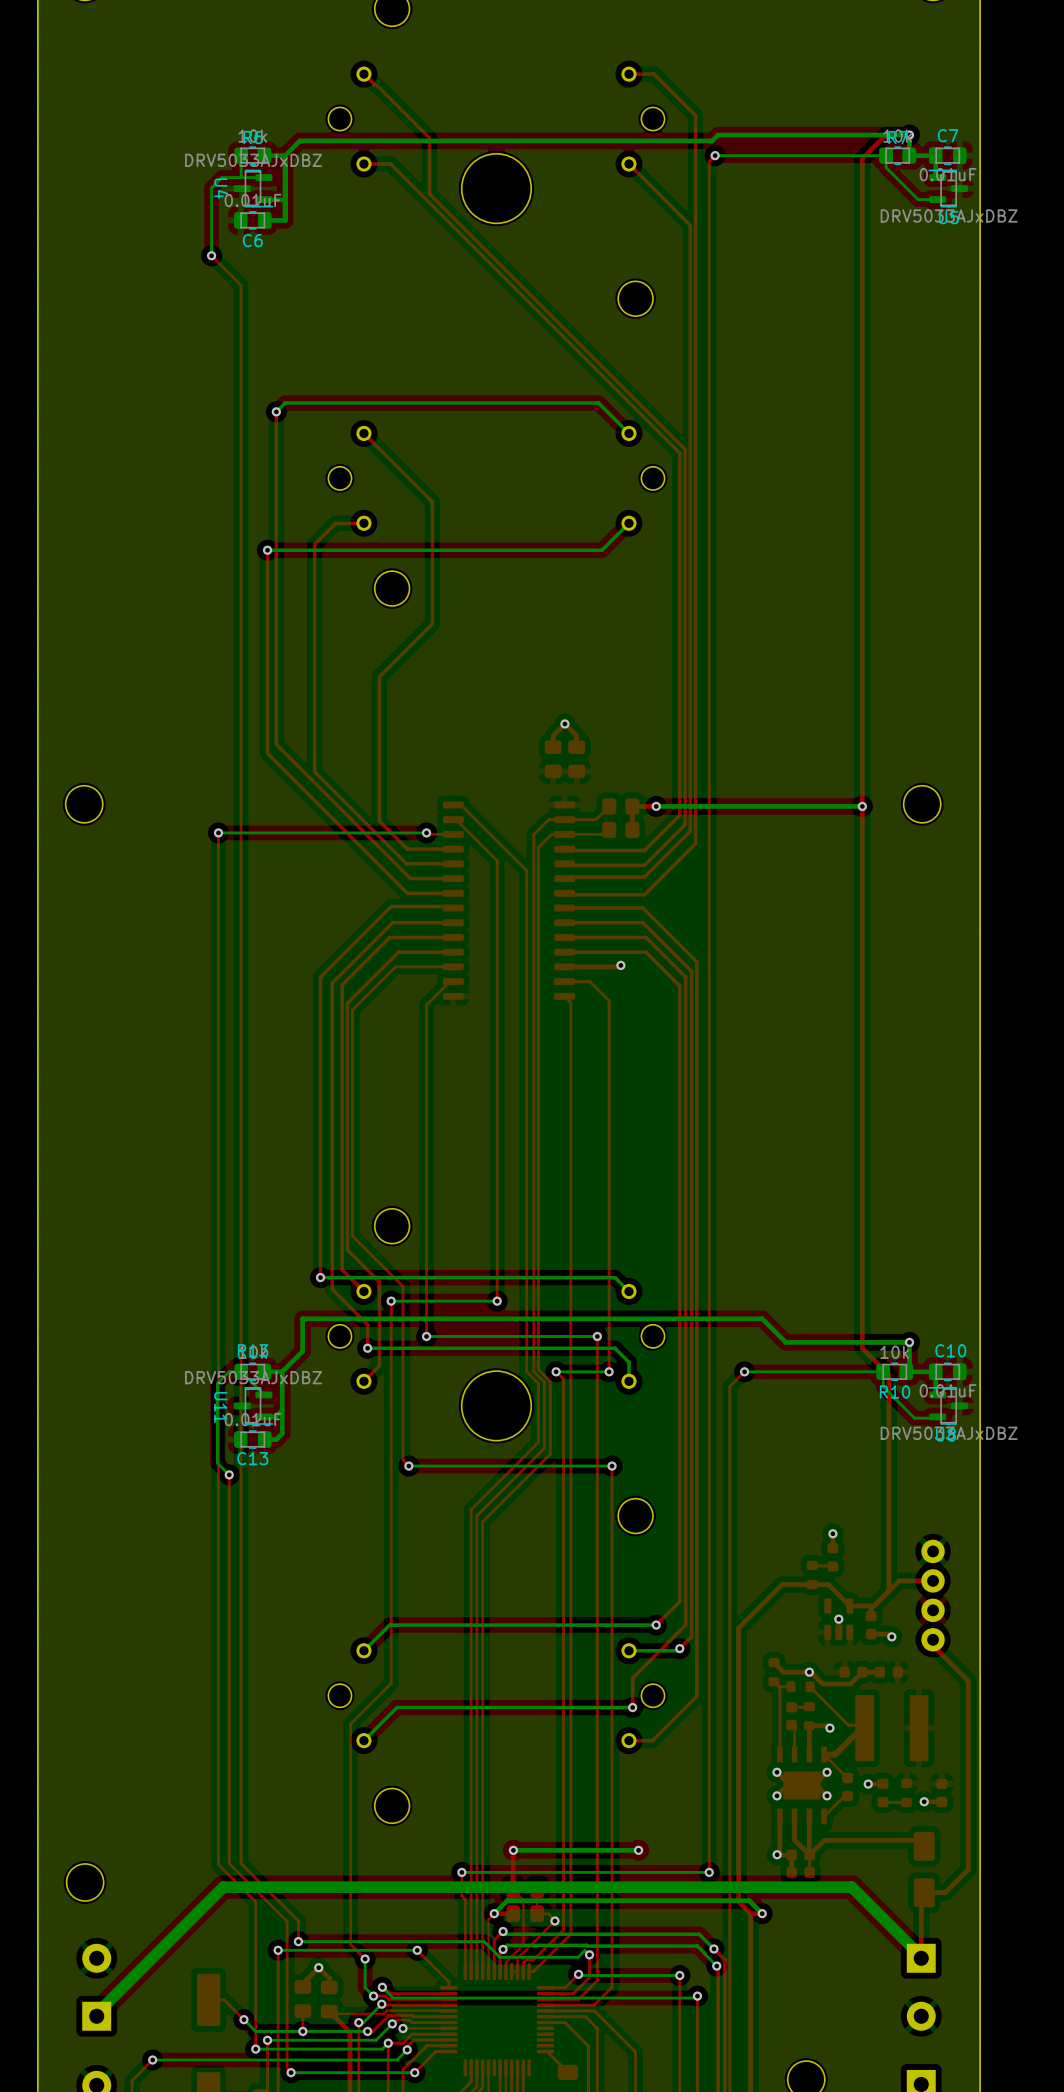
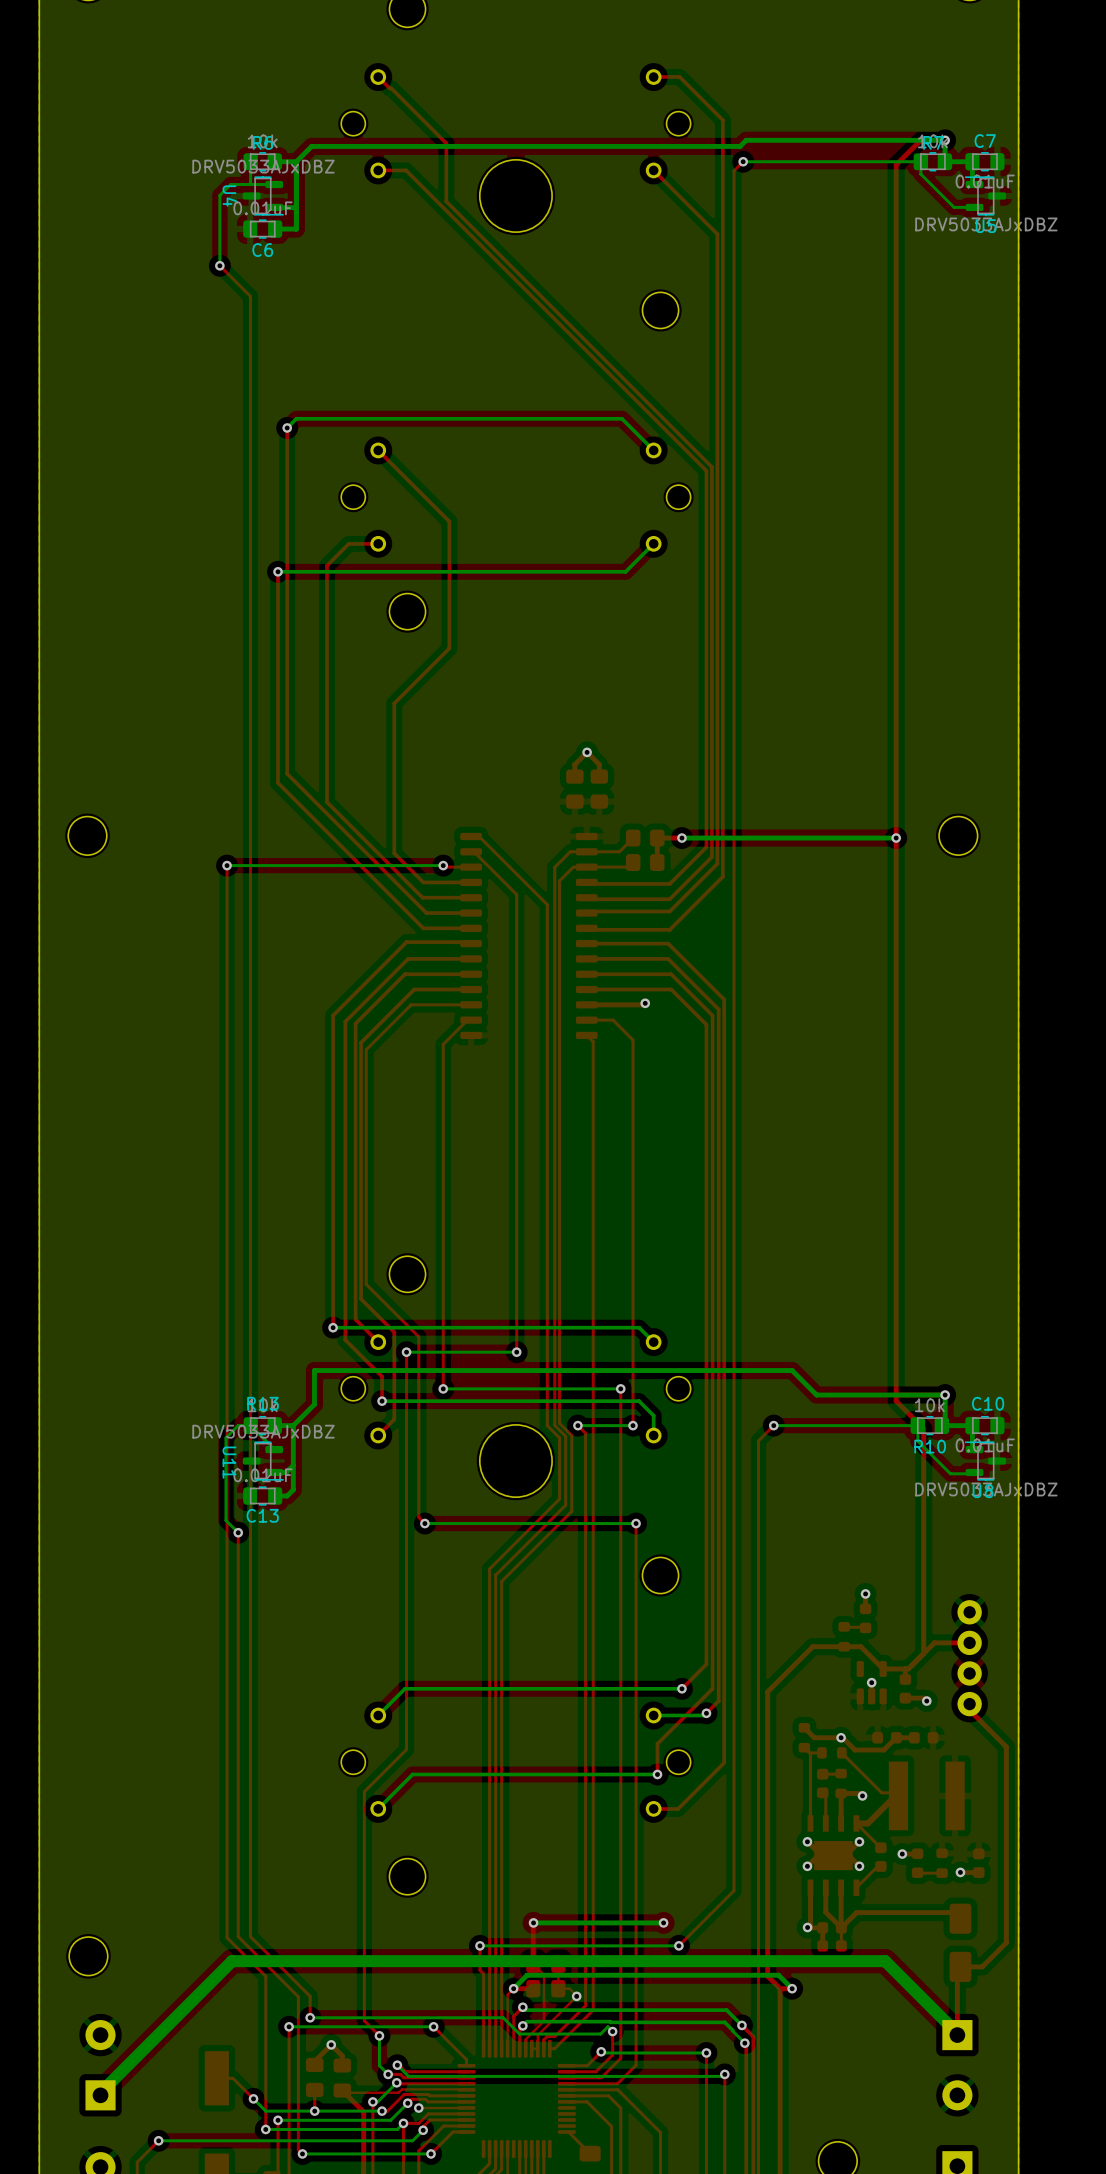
top track: (709, 161) (709, 1872) -> (737, 167) (733, 170) (733, 1890) (678, 1945)
bottom track: (709, 1872) (653, 1872) -> none
via position: (709, 1872) -> (678, 1945)

